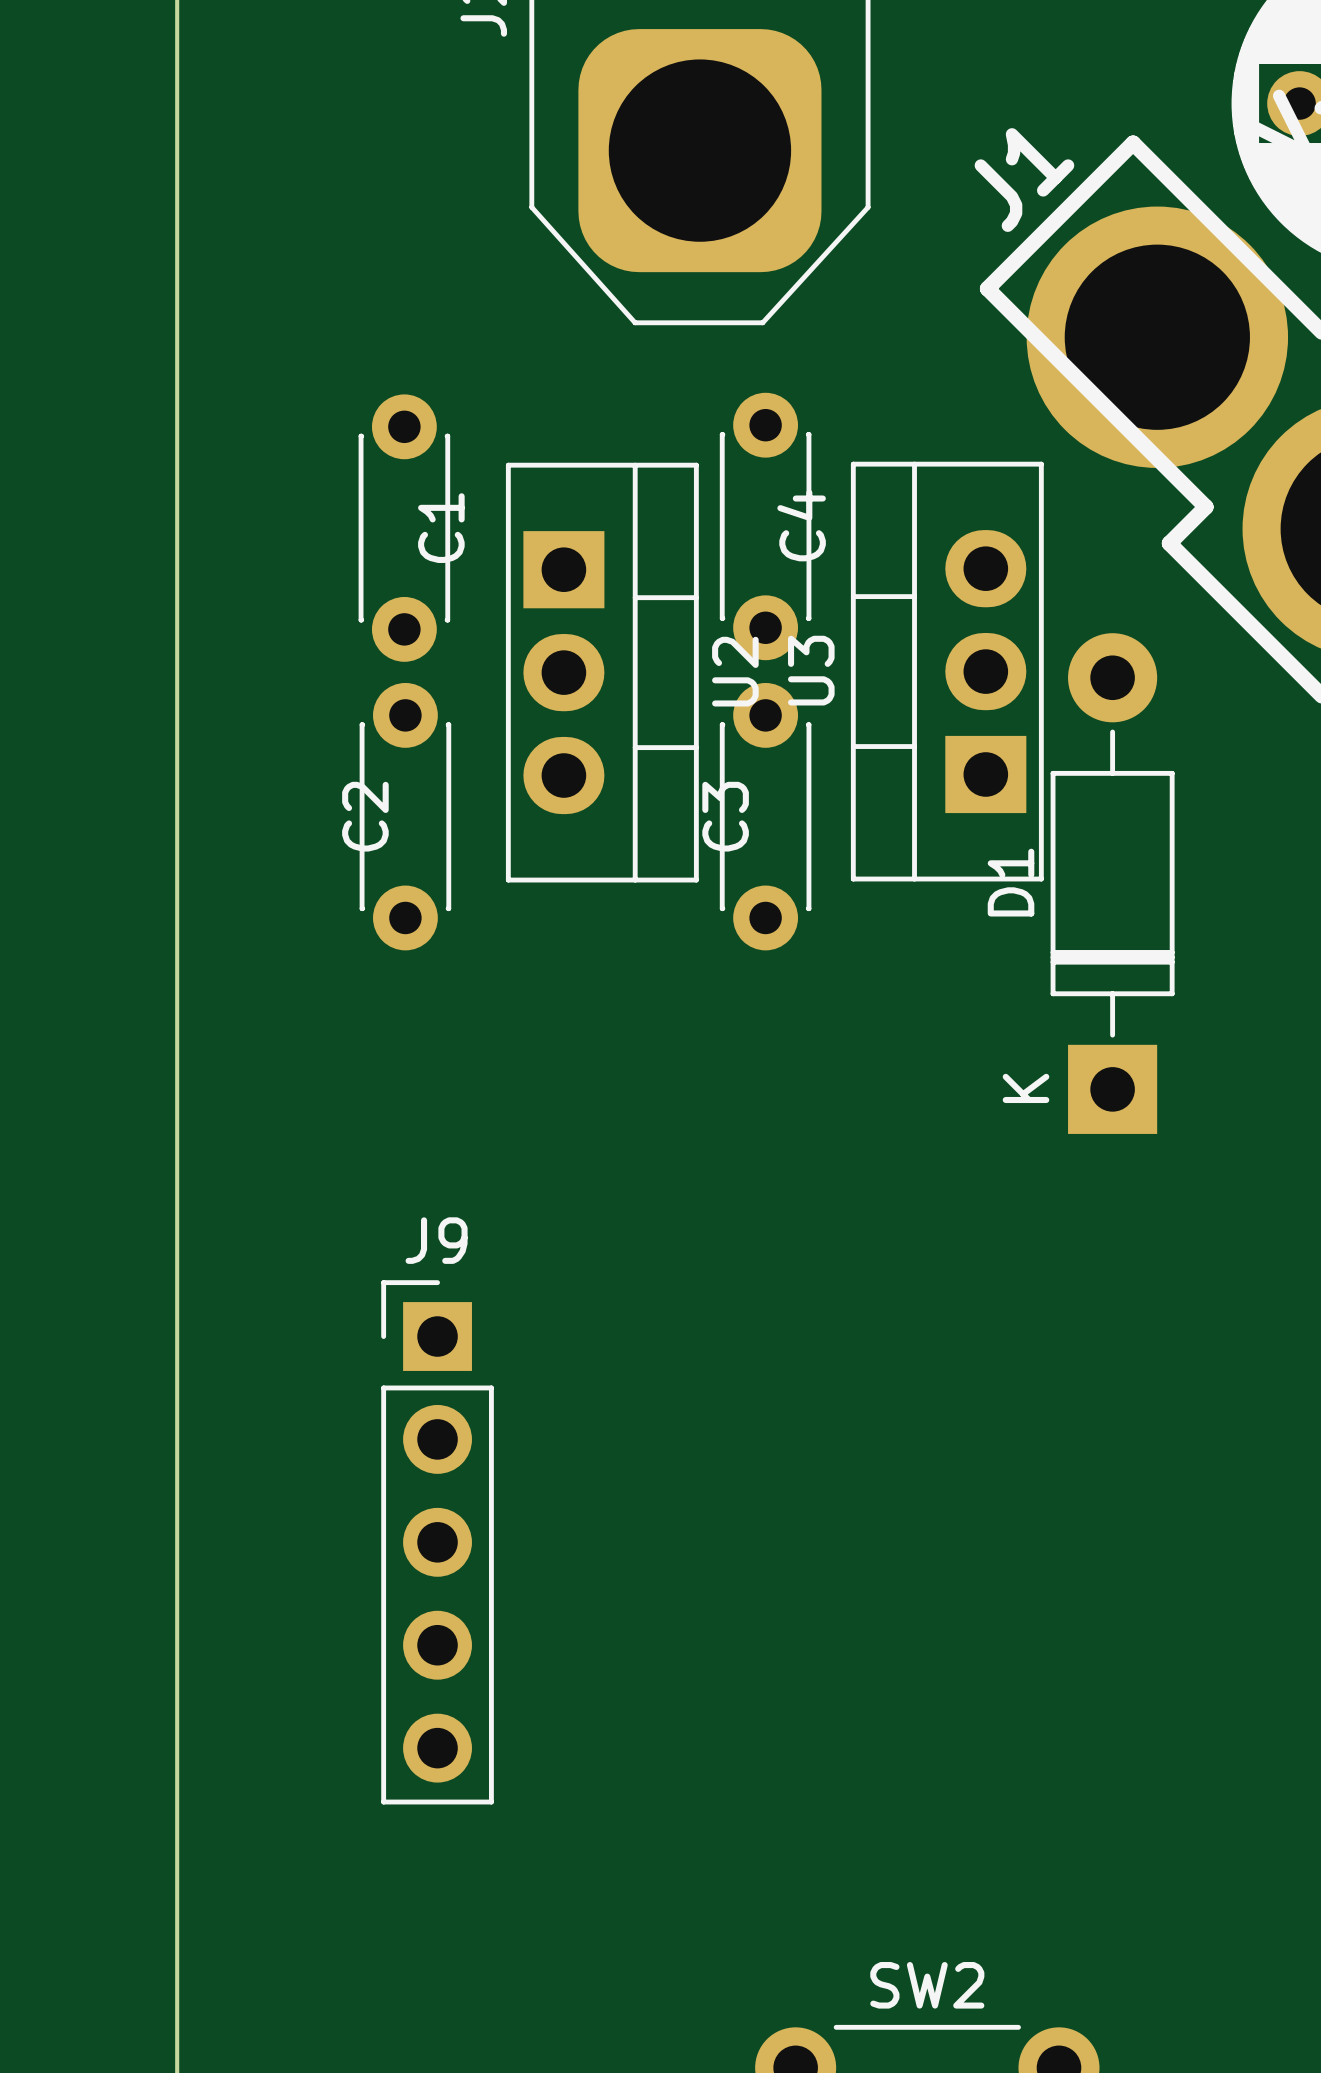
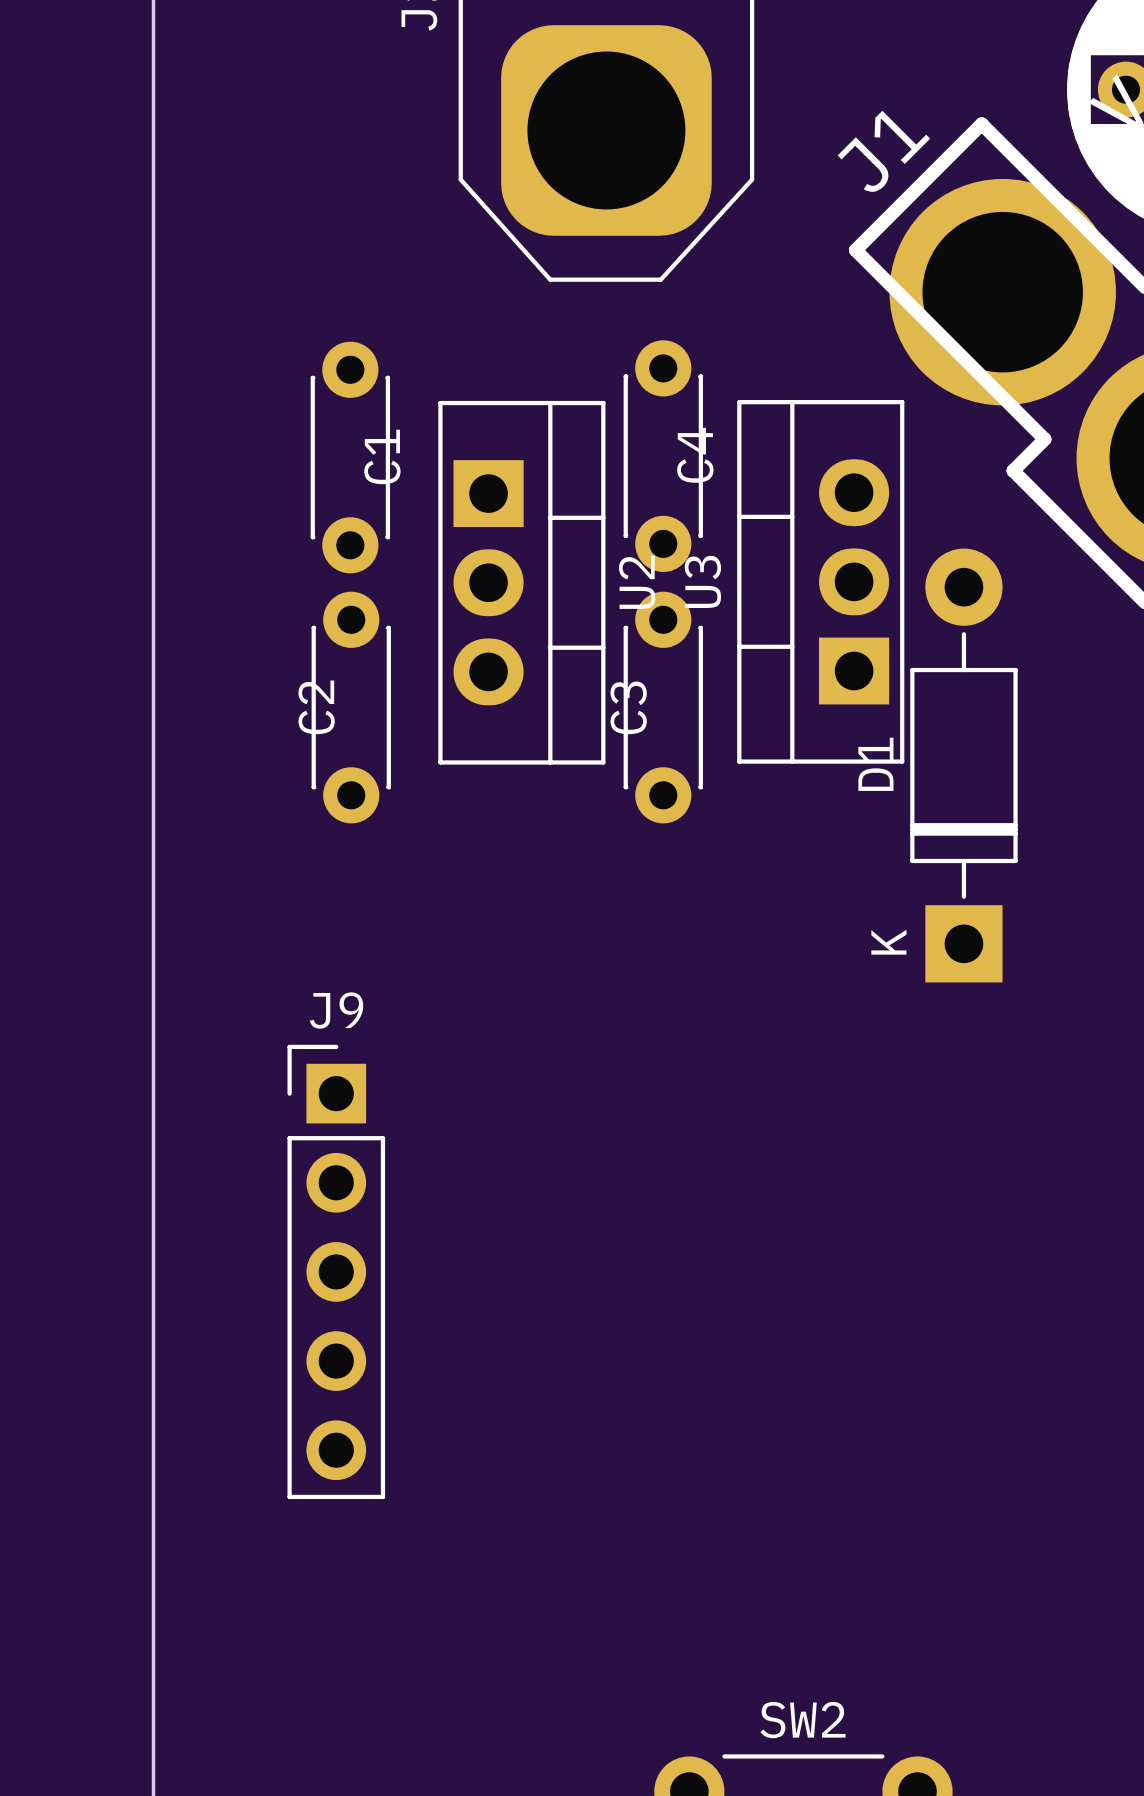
J9 position: (437, 1542) -> (336, 1271)

